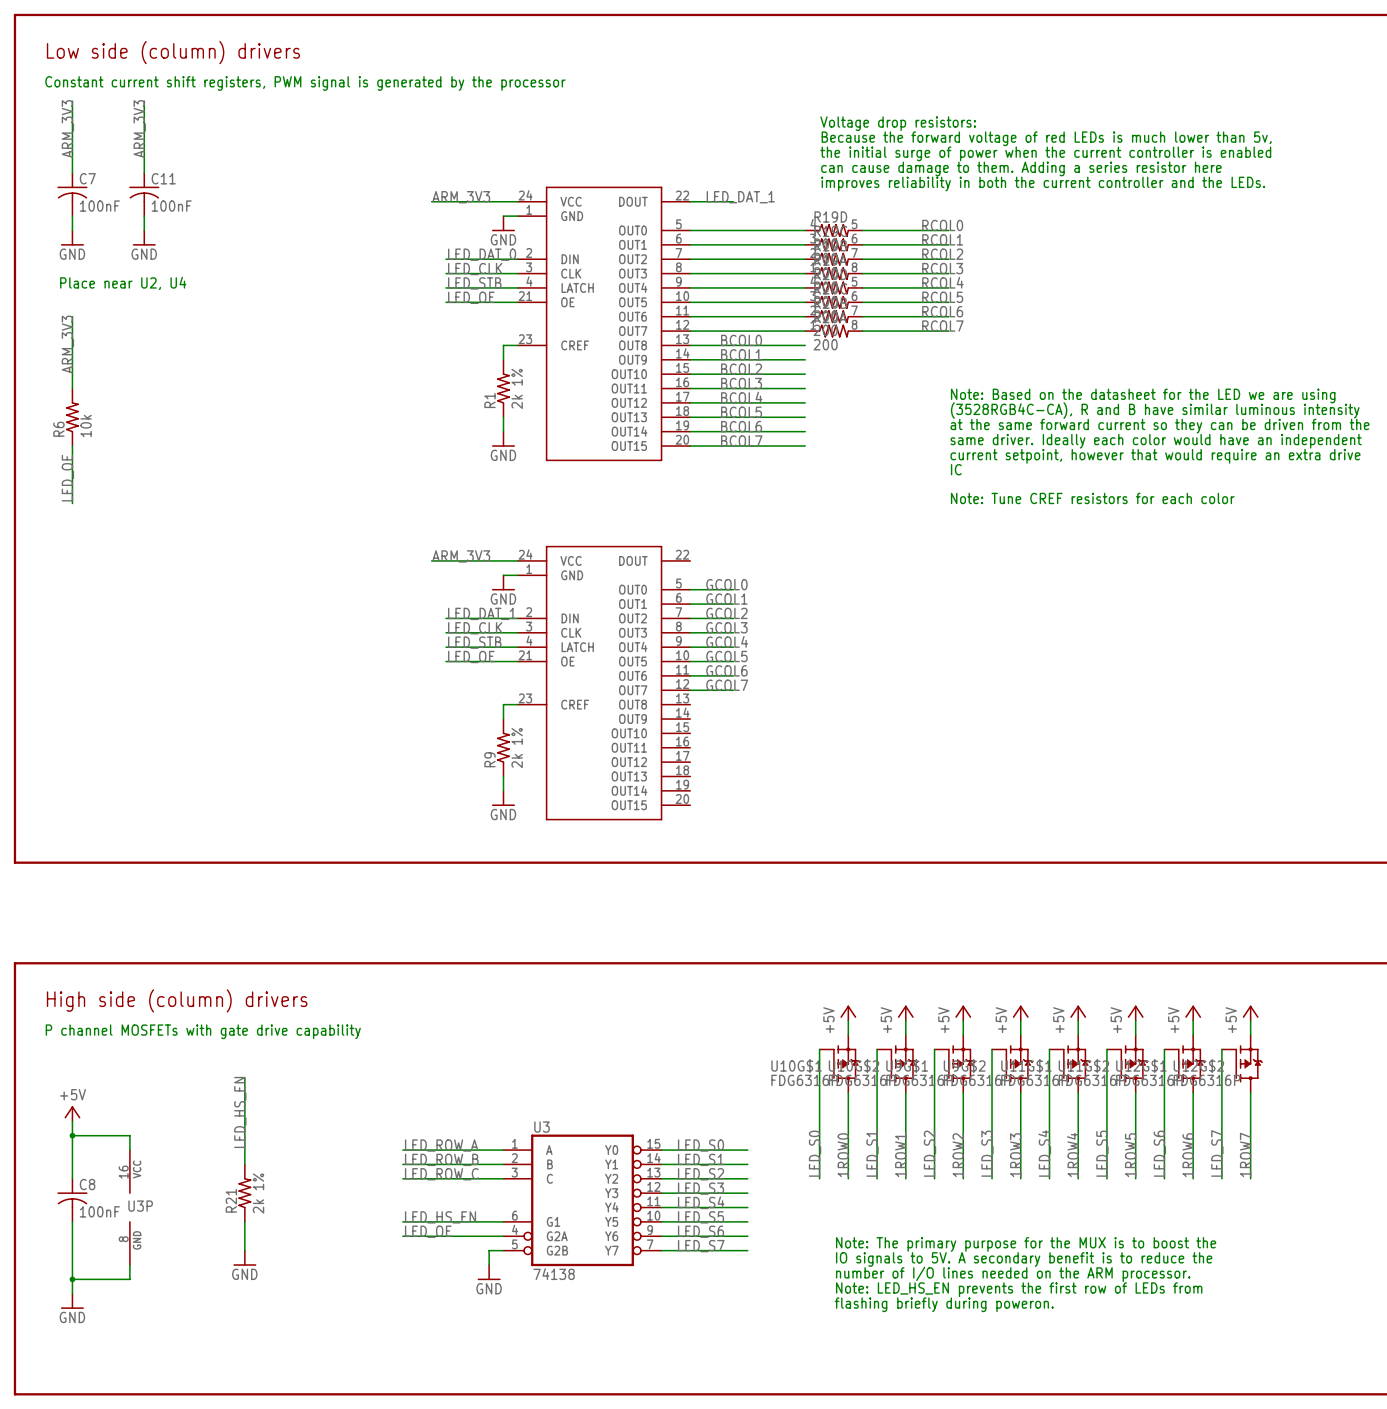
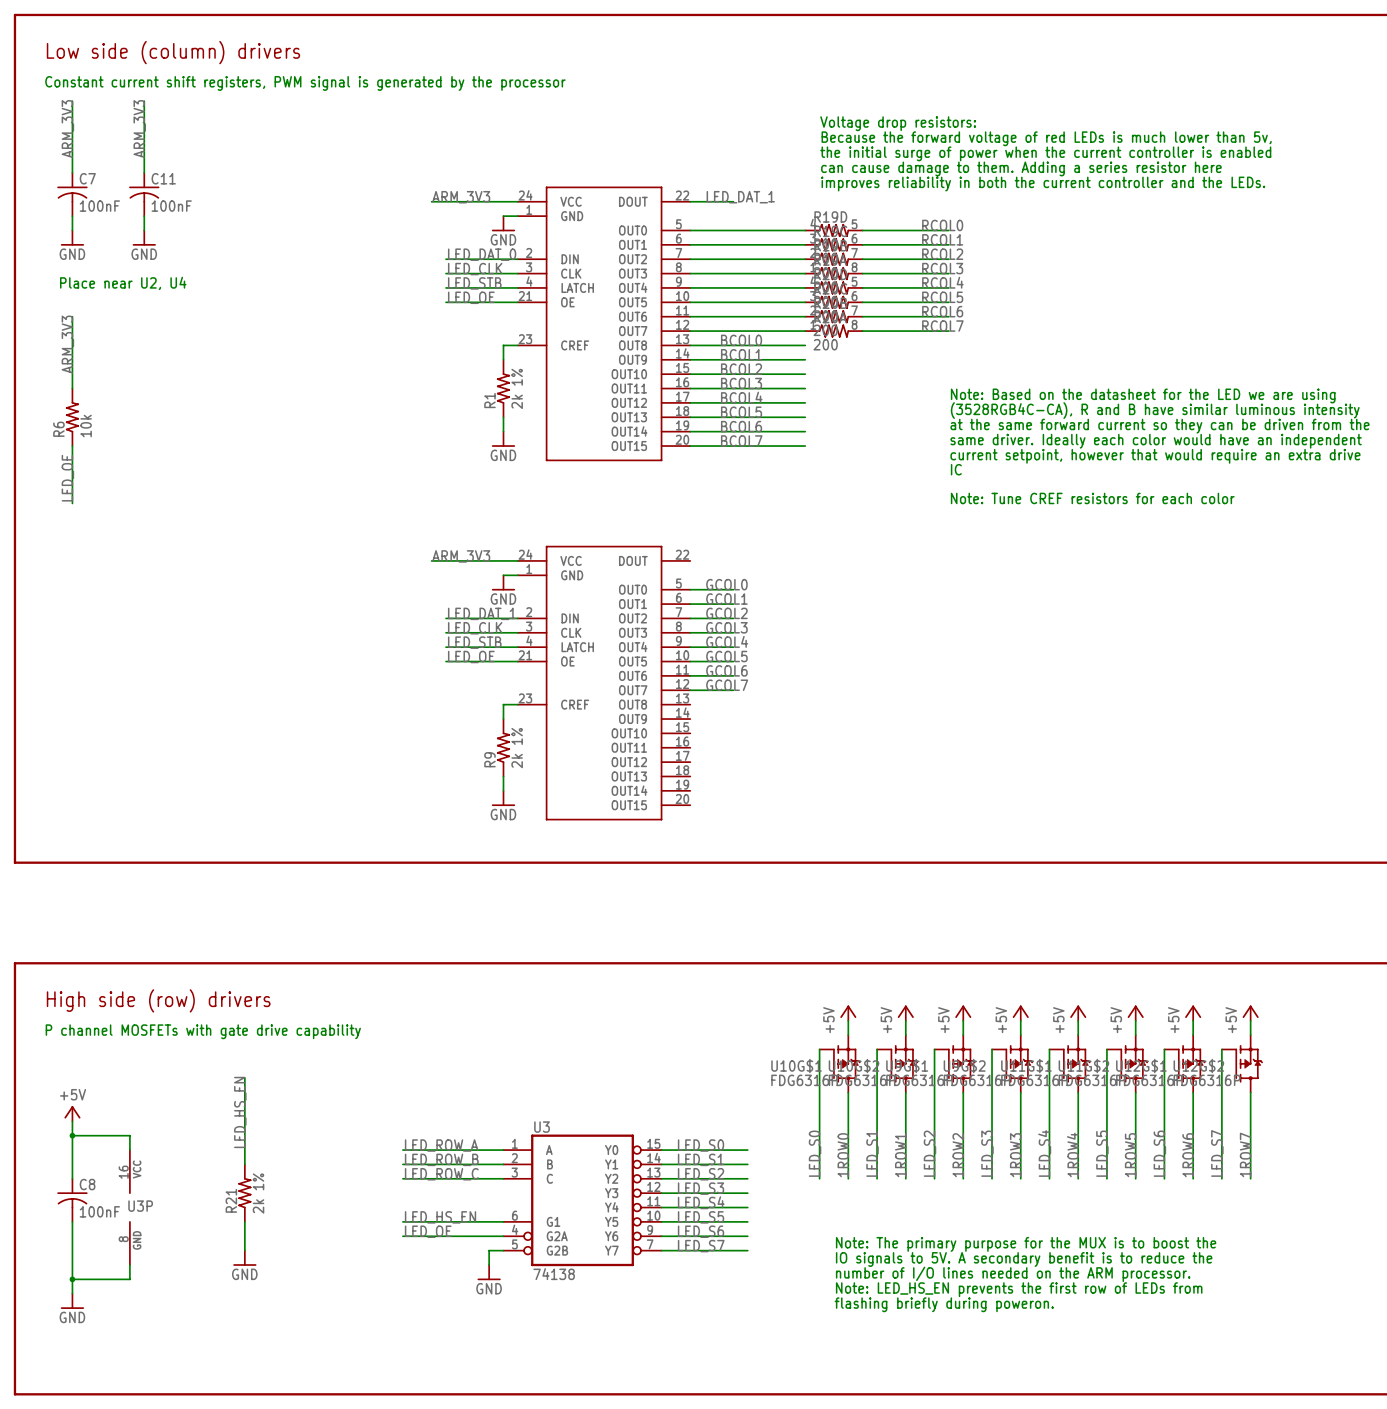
text: High side (column) drivers (177, 1000) -> High side (row) drivers (158, 1000)

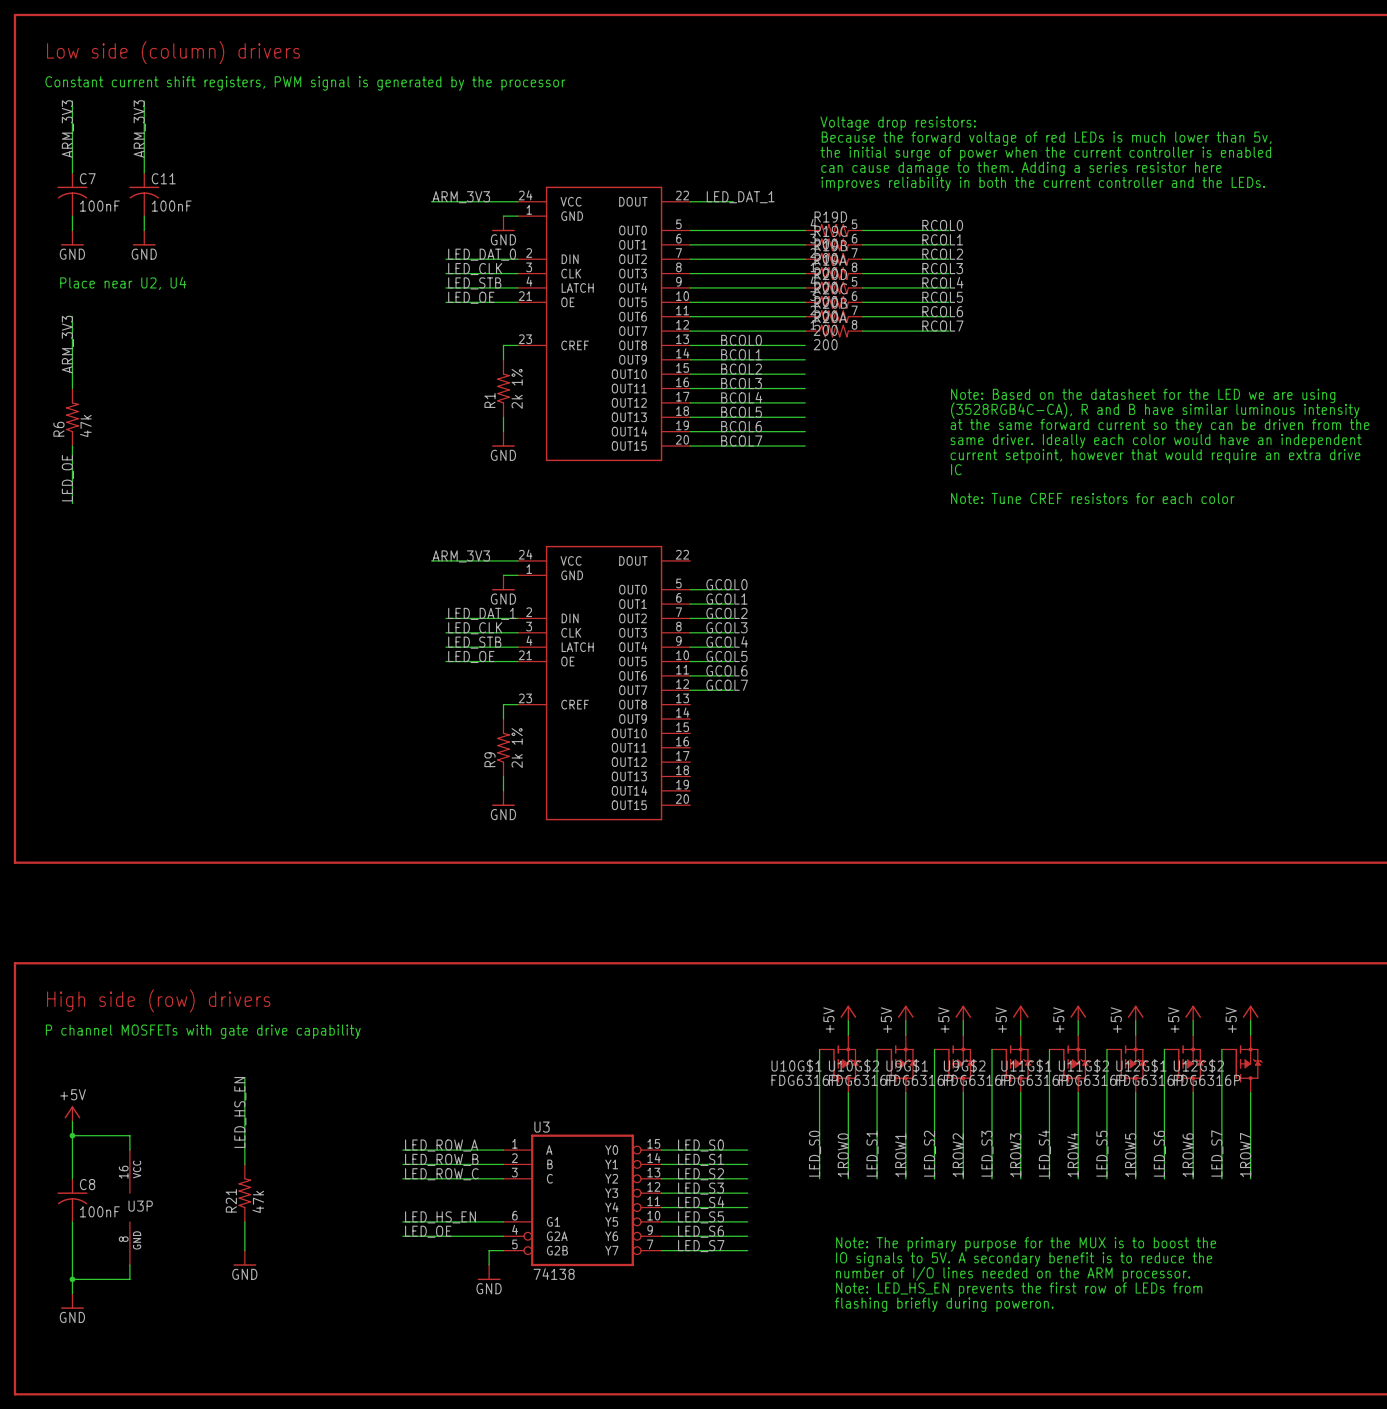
R6 value: 10k (86, 426) -> 47k (85, 426)
R21 value: 2k 1% (258, 1193) -> 47k (258, 1201)

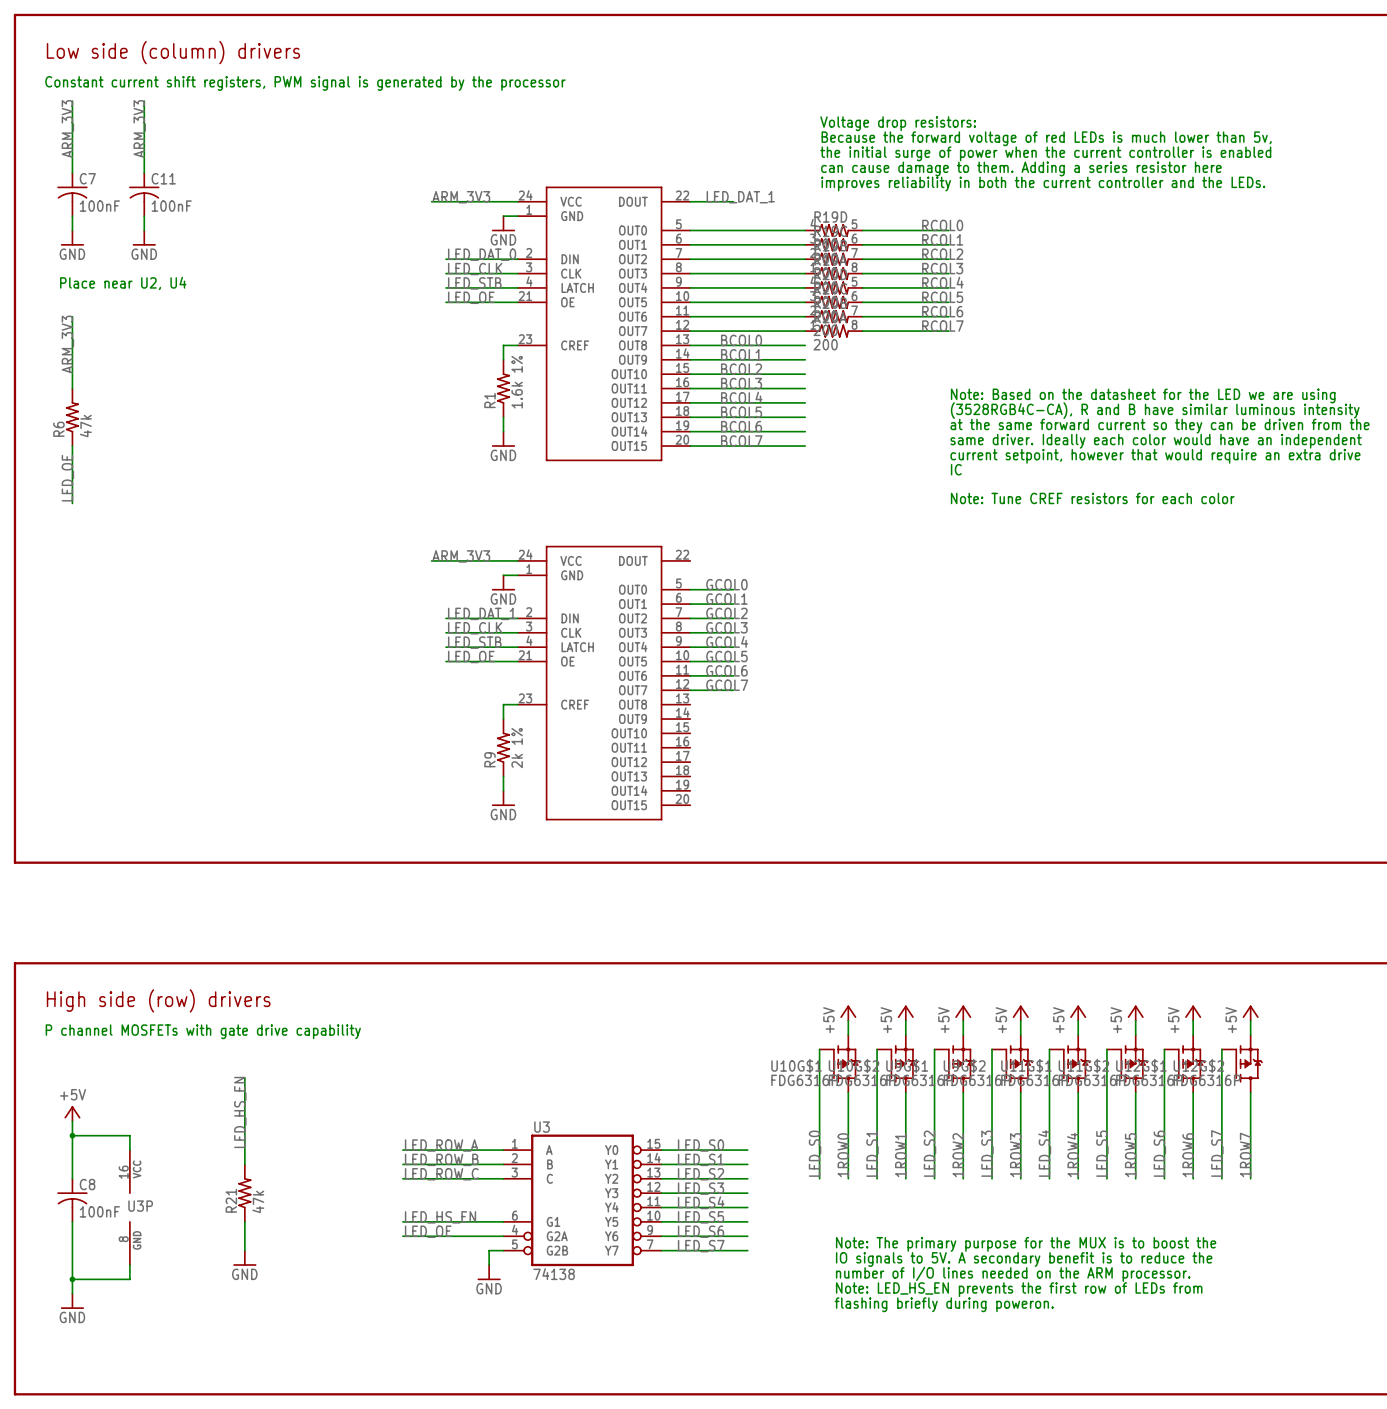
R1 value: 2k 1% (517, 388) -> 1.6k 1% (517, 382)

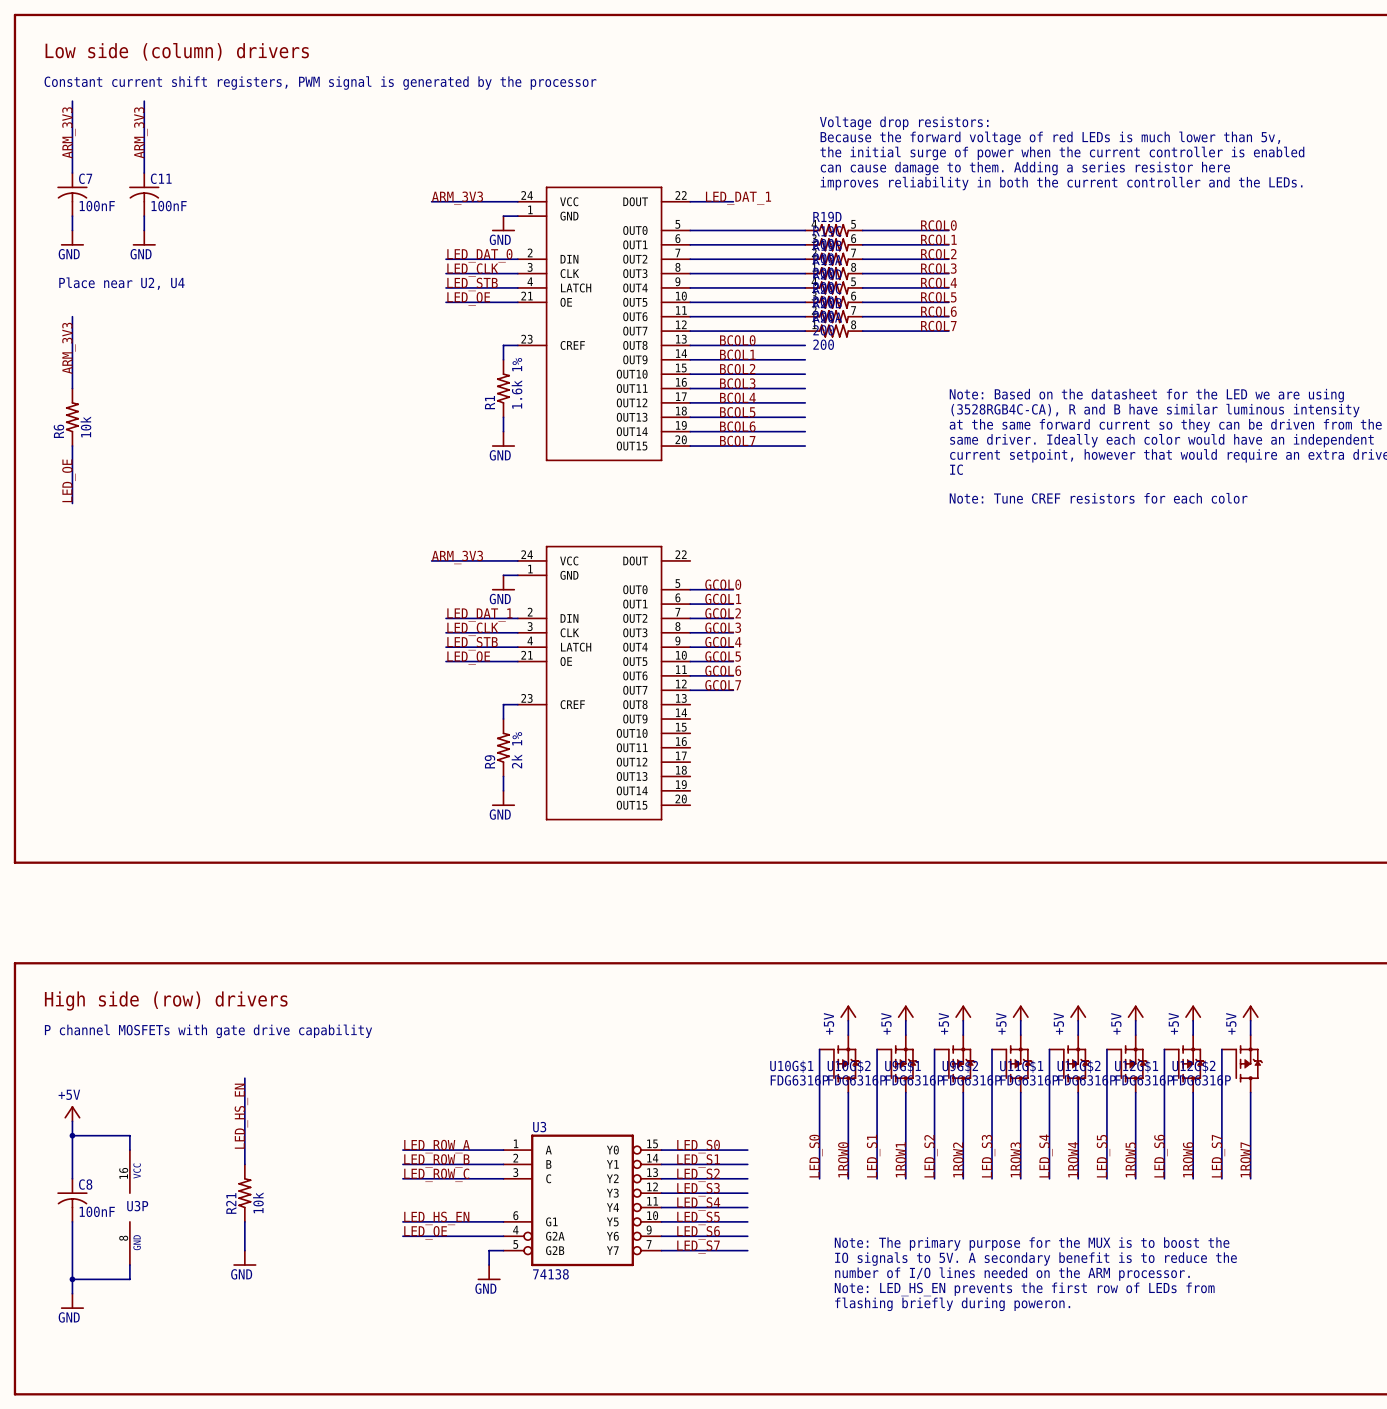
R6 value: 47k (85, 426) -> 10k (85, 426)
R21 value: 47k (258, 1201) -> 10k (258, 1202)

